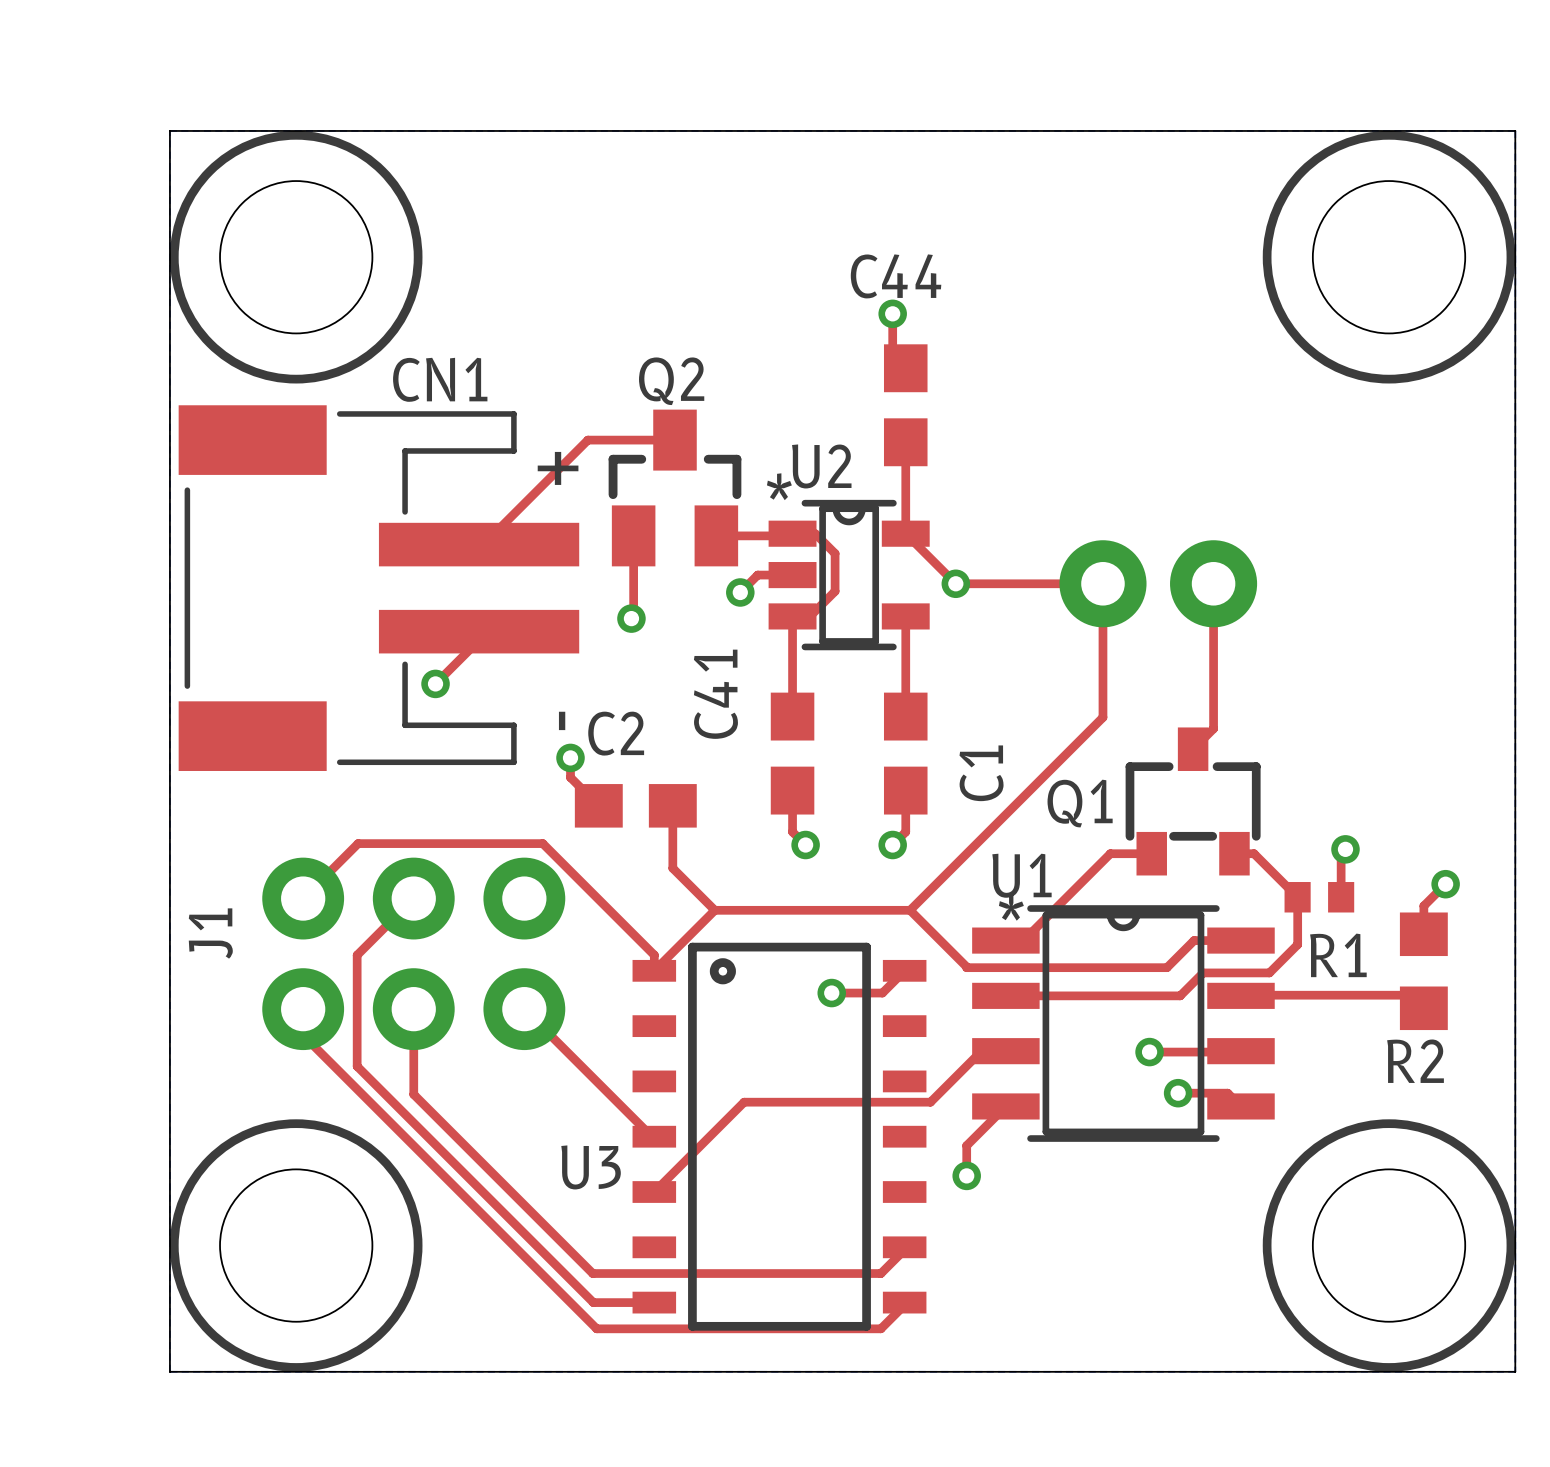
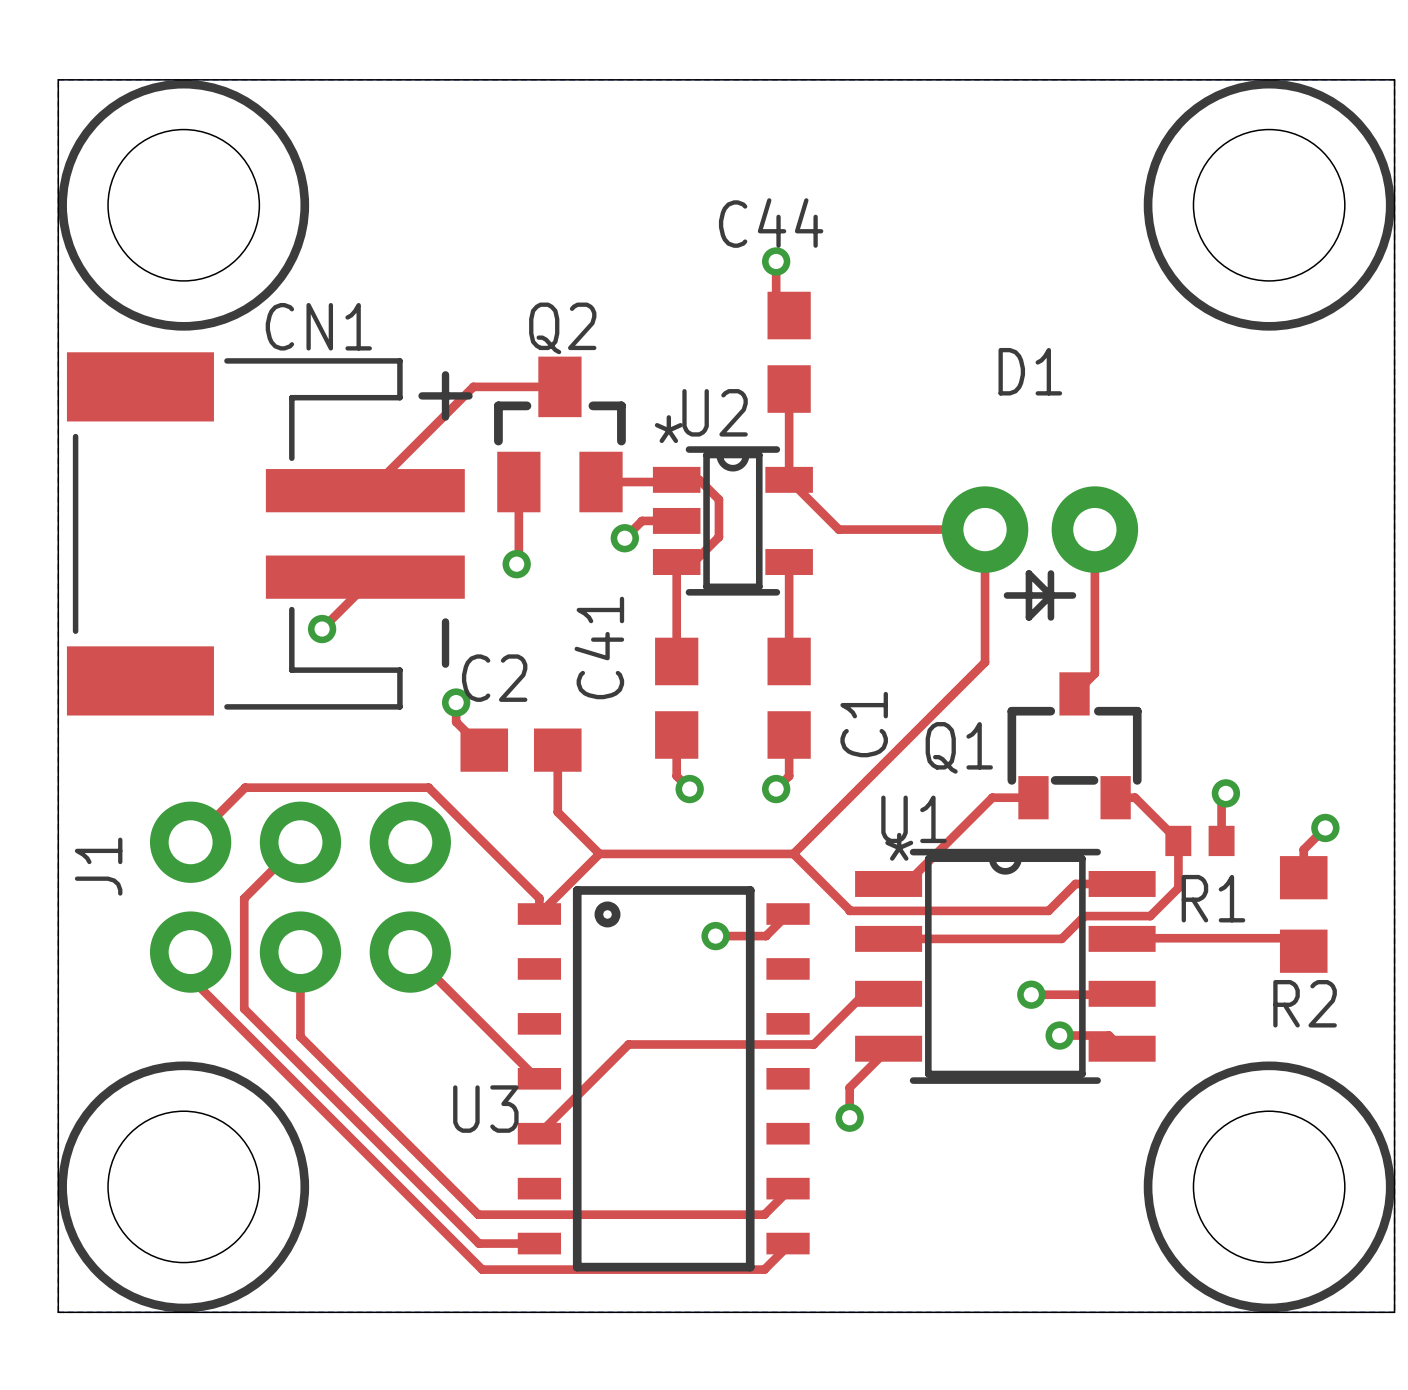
via: (955, 583) -> none
D1 side: bottom (1158, 583) -> top (1039, 553)

